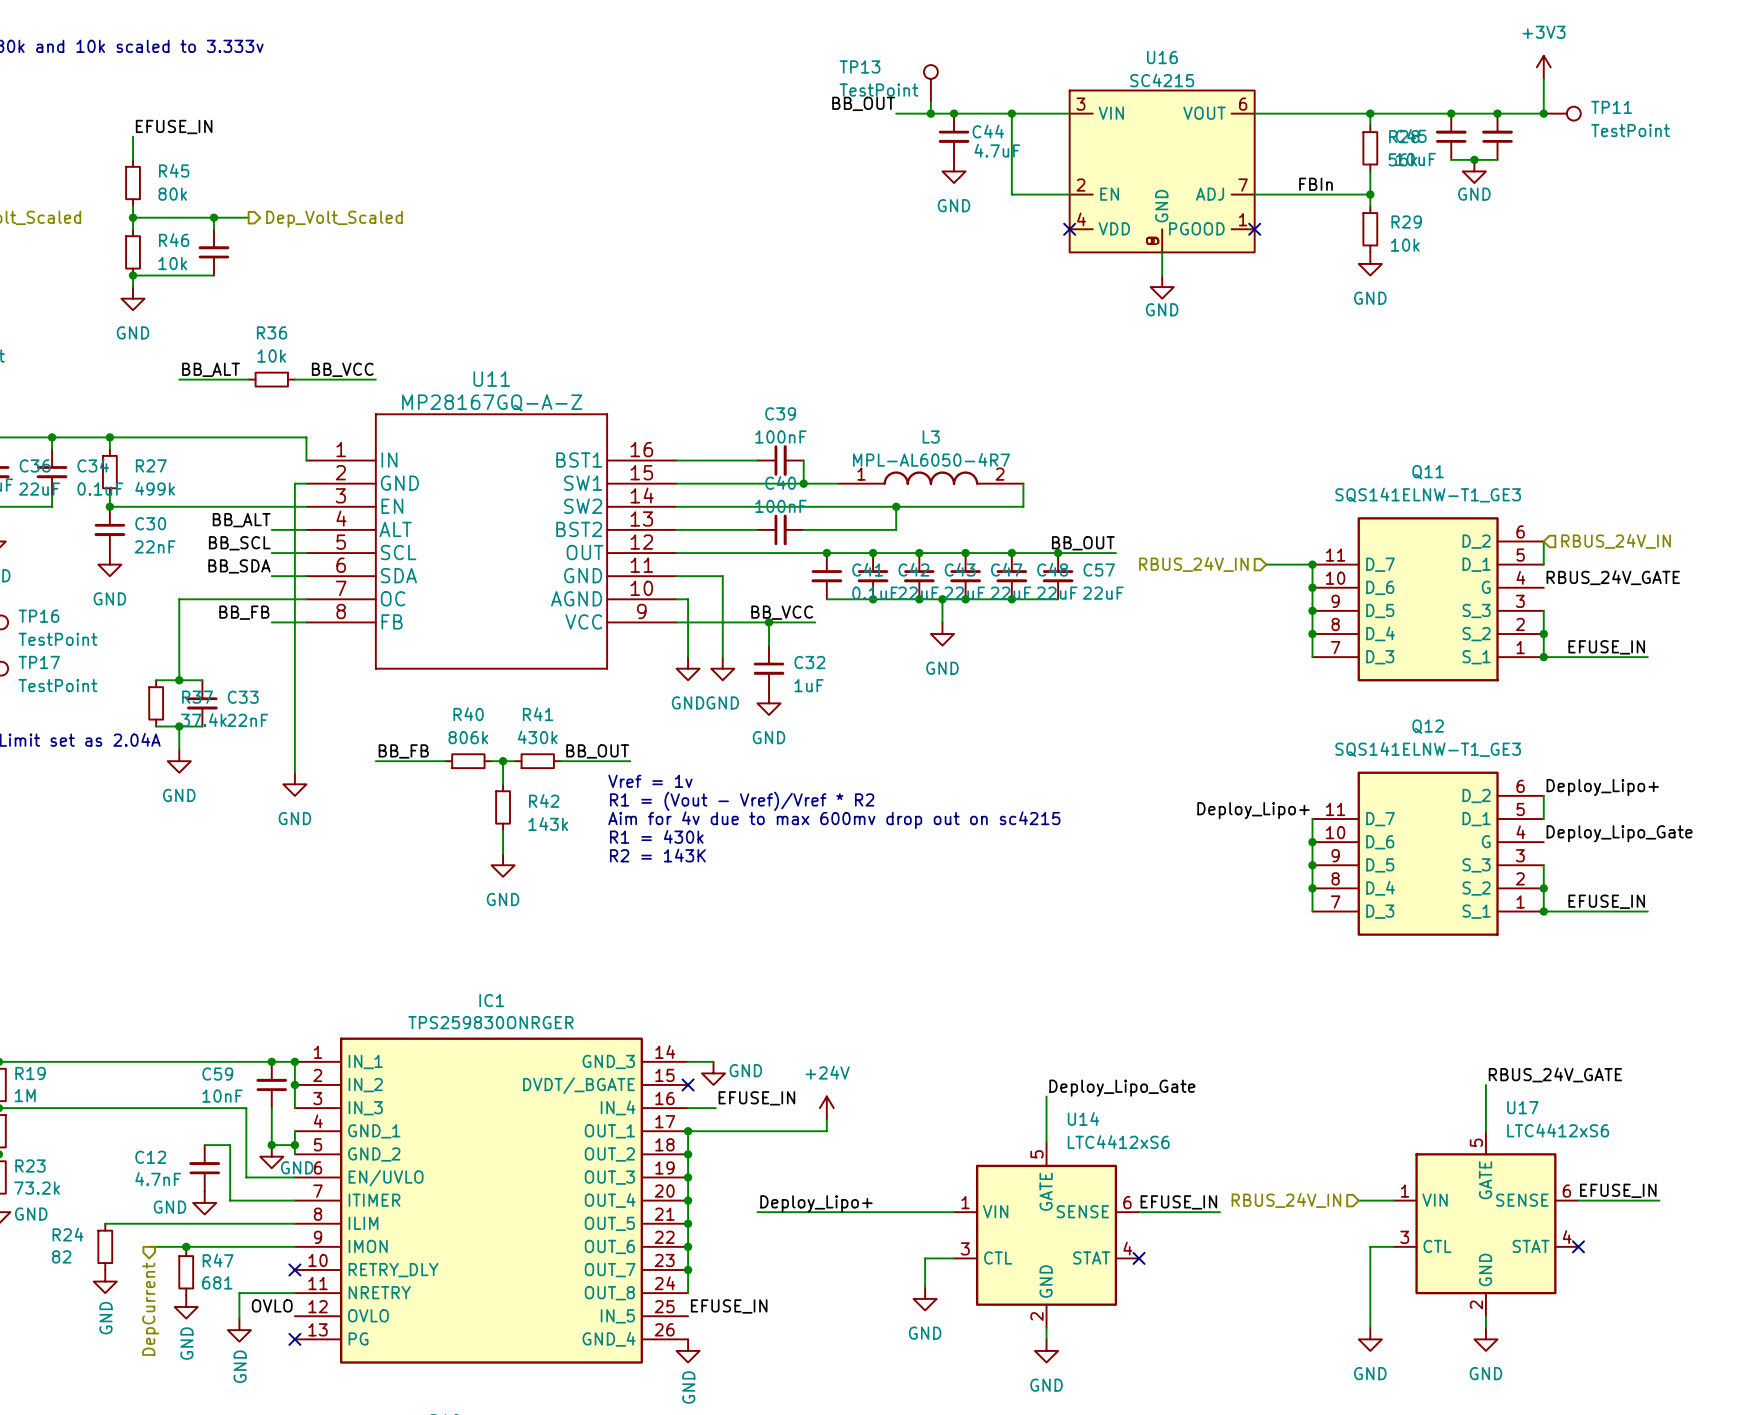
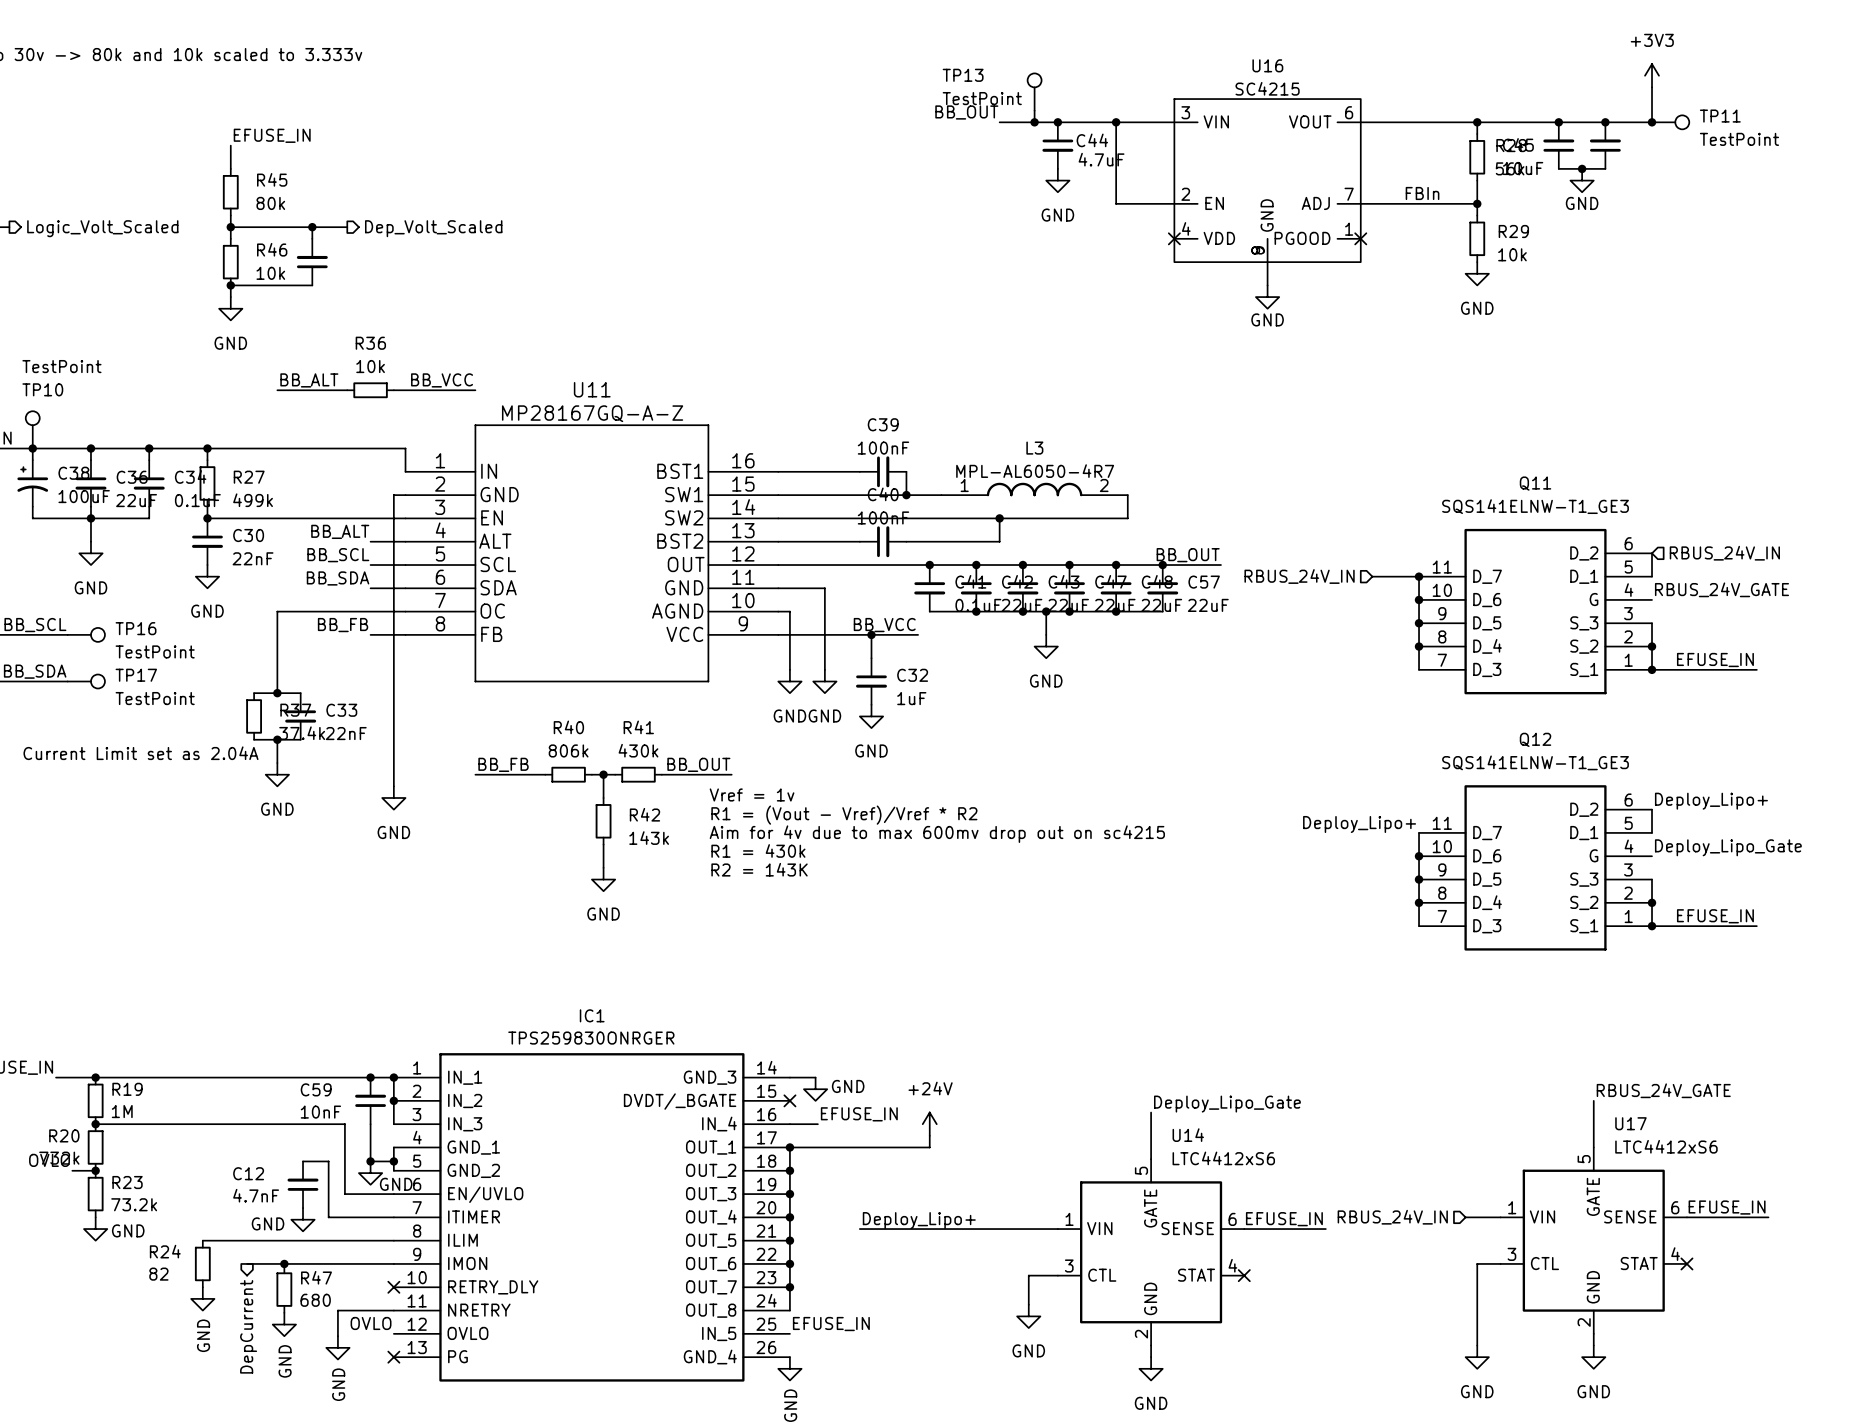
R47 value: 681 (217, 1282) -> 680 (315, 1300)

